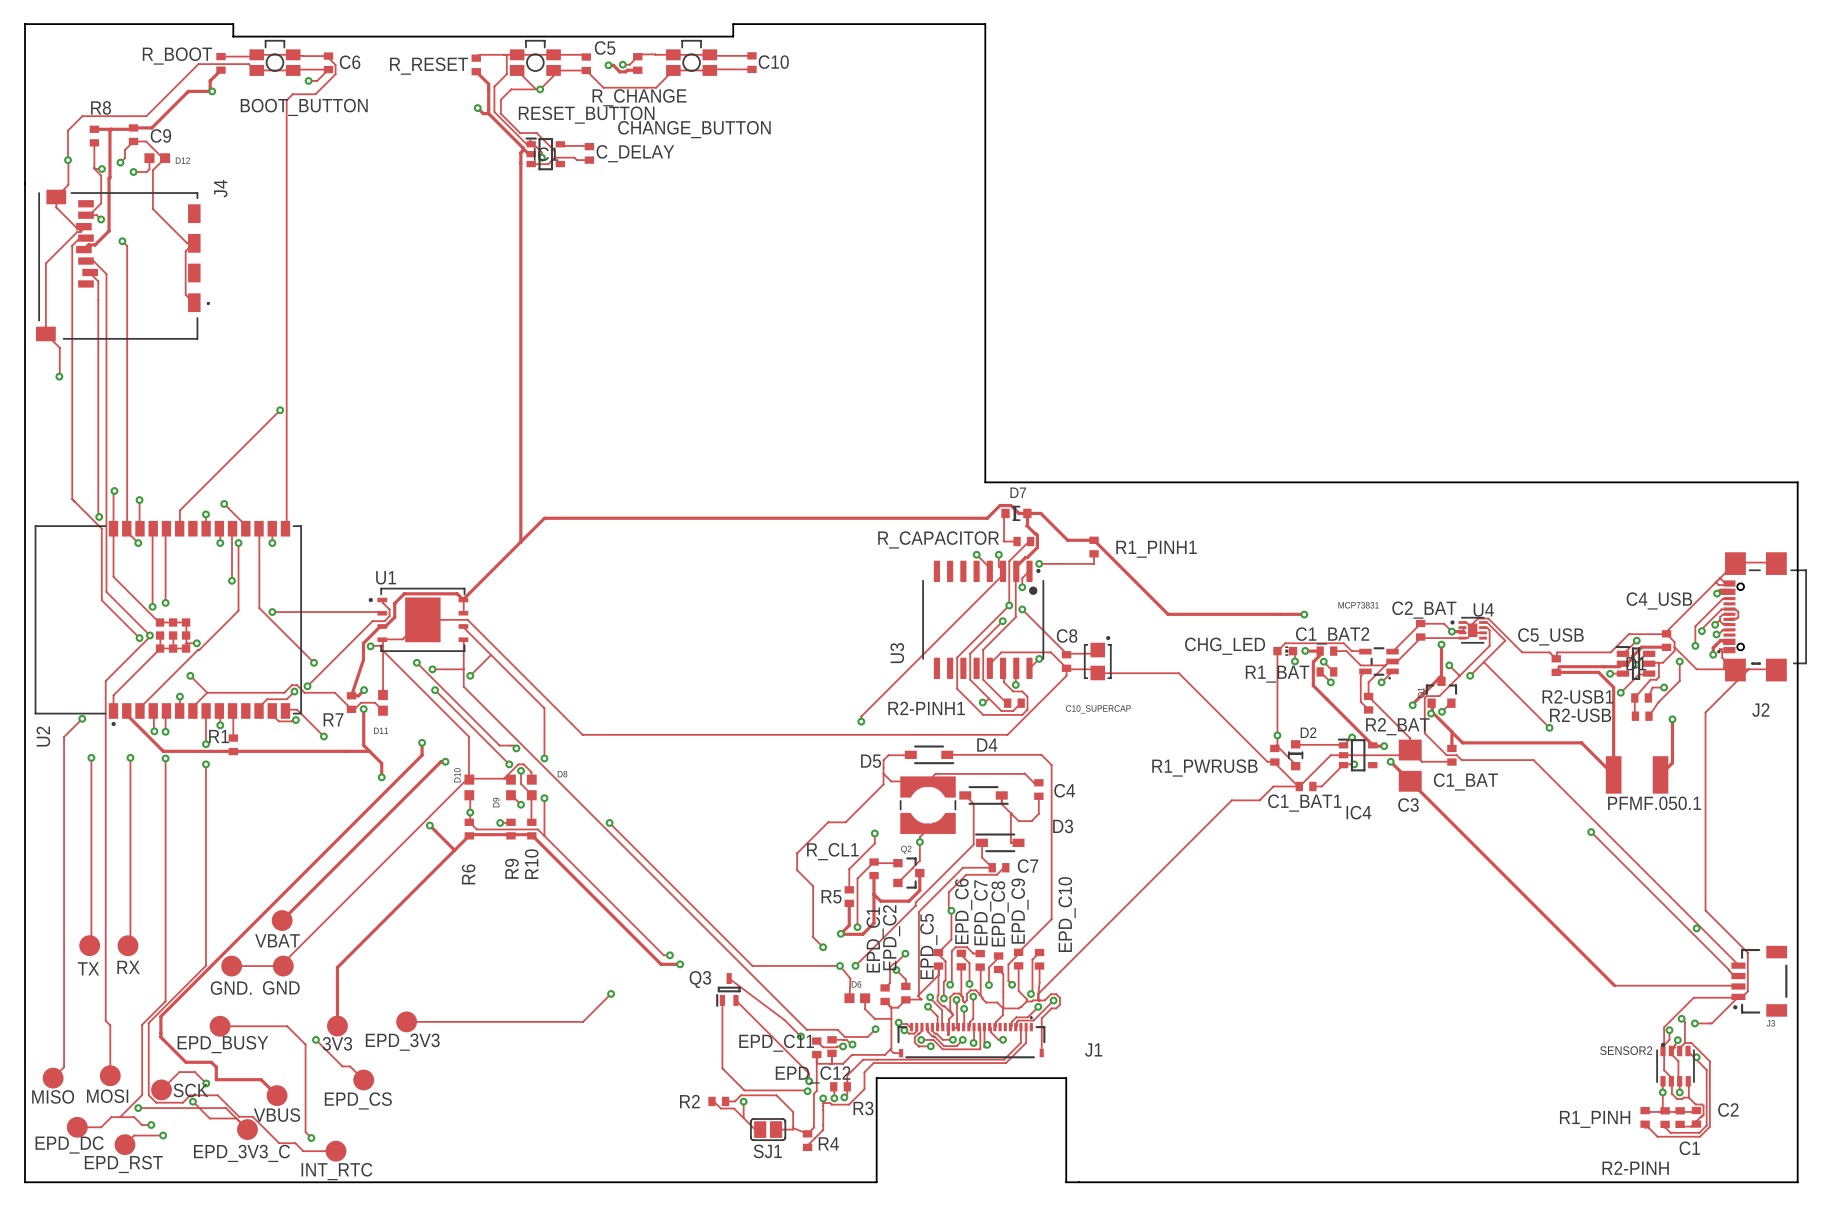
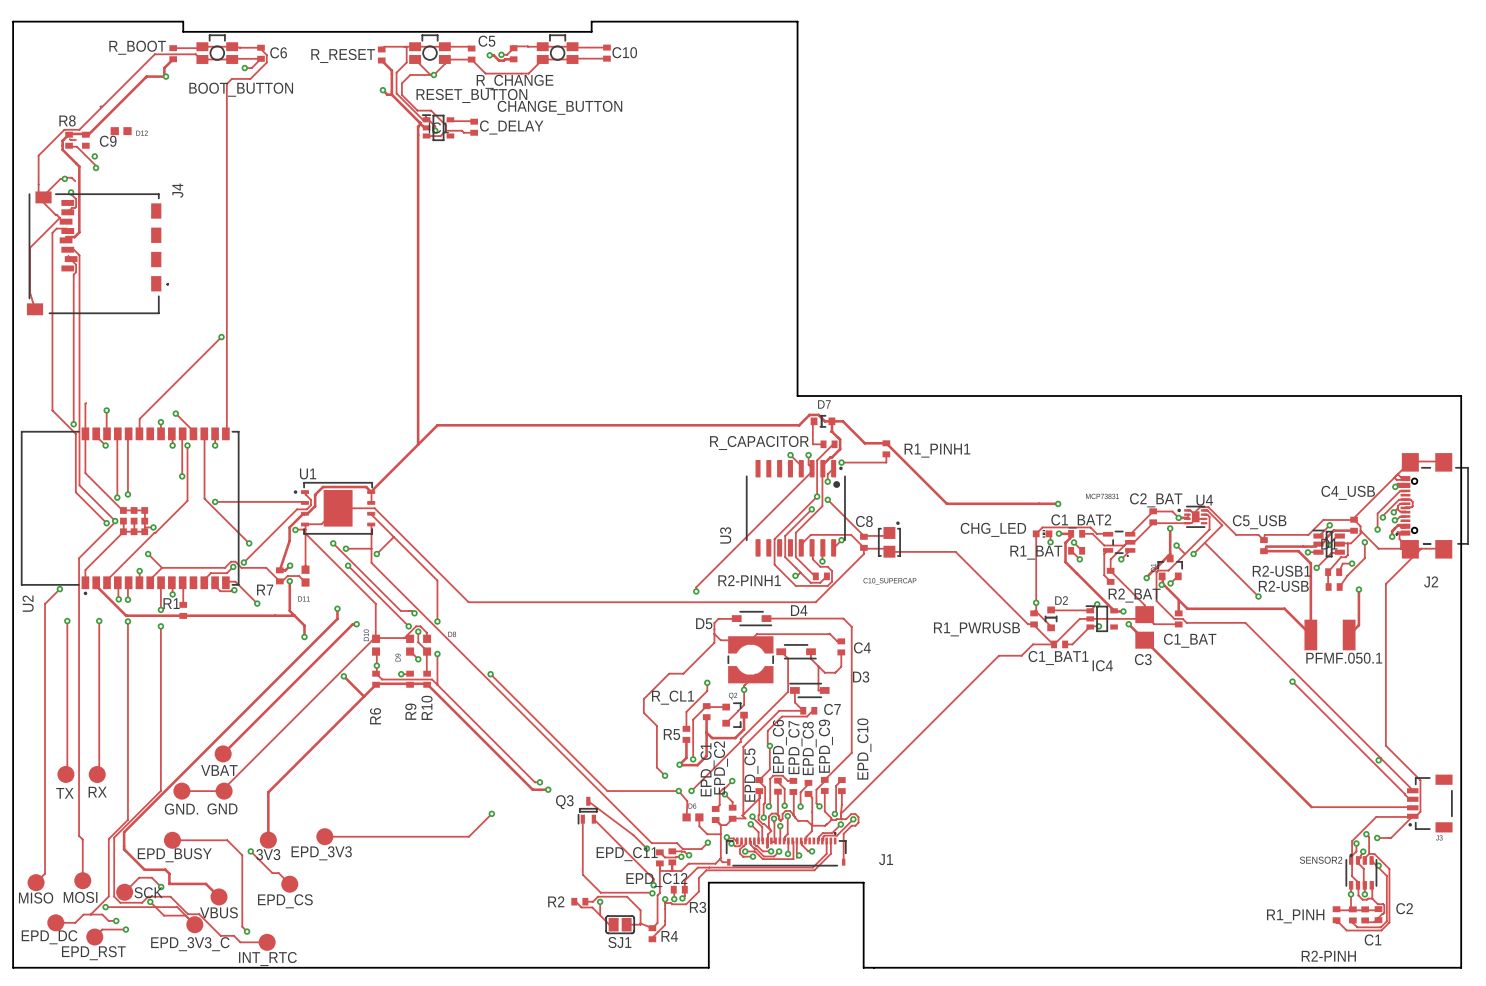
R8 name position: R8 (101, 107) -> R8 (67, 120)
track: (146, 116) (82, 116) (68, 130) (68, 184) (56, 196) (56, 207) (81, 231) -> (112, 96) (79, 129) (64, 129) (38, 155) (38, 192) (43, 197) (40, 200) (59, 217) (30, 247) (30, 292) (35, 309)
track: (151, 127) (94, 129) -> (116, 106) (88, 134) (69, 133) (62, 140) (62, 149) (79, 166) (79, 232) (74, 237) (66, 237) (66, 240)
track: (111, 129) (109, 231) (95, 244) (88, 244) (83, 249) -> none
C9 position: (133, 134) -> (85, 140)
R8 position: (94, 136) -> (69, 140)
track: (94, 142) (94, 168) (101, 175) (101, 203) (89, 215) -> none
track: (149, 158) (149, 169) (146, 171) (133, 171) -> none
via: (68, 160) -> none
track: (120, 162) (124, 158) (124, 150) (133, 141) (146, 141) (162, 158) (165, 158) (152, 170) (152, 209) (187, 243) (194, 243) -> none
via: (120, 162) -> none
via: (101, 169) -> none
via: (133, 171) -> none
track: none -> (69, 145) (76, 146) (97, 166) (96, 167)
via: none -> (94, 156)
via: none -> (96, 167)
track: none -> (64, 178) (60, 178) (42, 196)
via: none -> (64, 178)
via: (101, 219) -> none
track: (83, 226) (45, 263) (45, 333) (59, 347) (59, 376) -> none
track: none -> (71, 192) (76, 199) (76, 206) (67, 212)
via: none -> (71, 192)
track: (85, 238) (79, 238) (72, 245) (73, 500) -> (67, 231) (65, 228) (56, 228) (52, 232) (52, 410)
track: (122, 241) (127, 246) (126, 528) -> none
via: (122, 241) -> none
track: (193, 243) (185, 251) (185, 294) (193, 302) -> none
track: (85, 261) (93, 261) (106, 273) (106, 591) -> (67, 249) (73, 249) (79, 255) (79, 485)
J4 position: (122, 265) -> (97, 253)
track: (90, 272) (98, 281) (99, 517) -> (71, 259) (68, 256) (76, 264) (76, 272) (73, 274) (73, 424)
via: (59, 376) -> none
via: (114, 491) -> none

